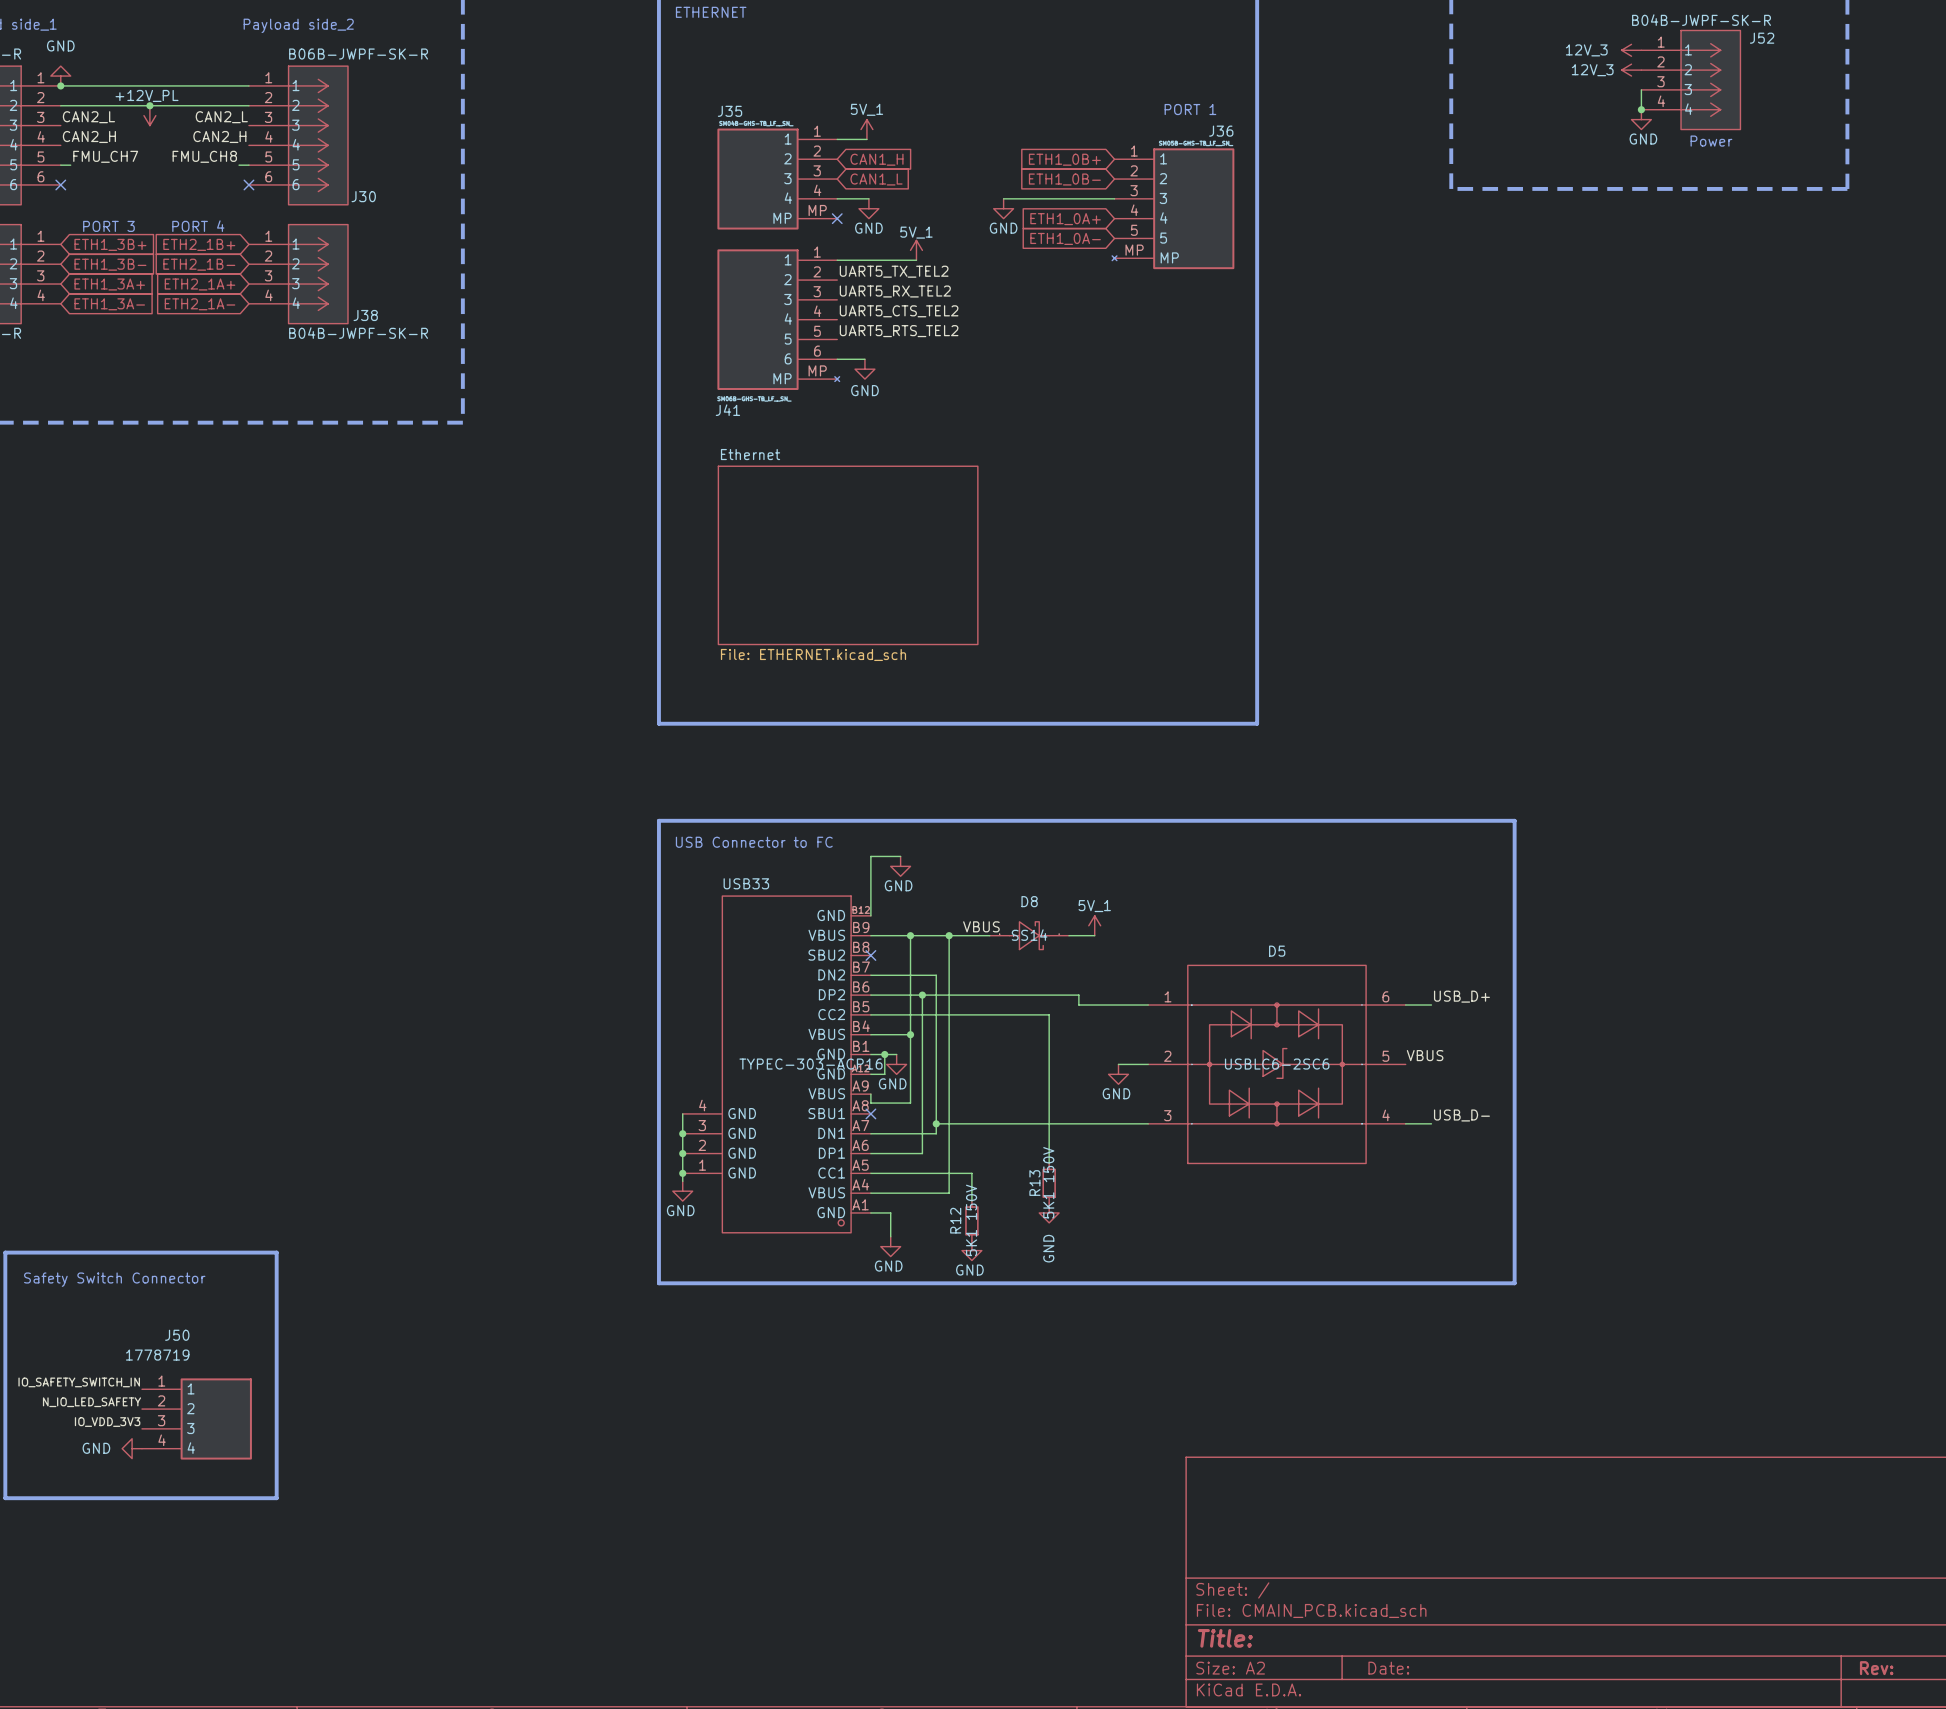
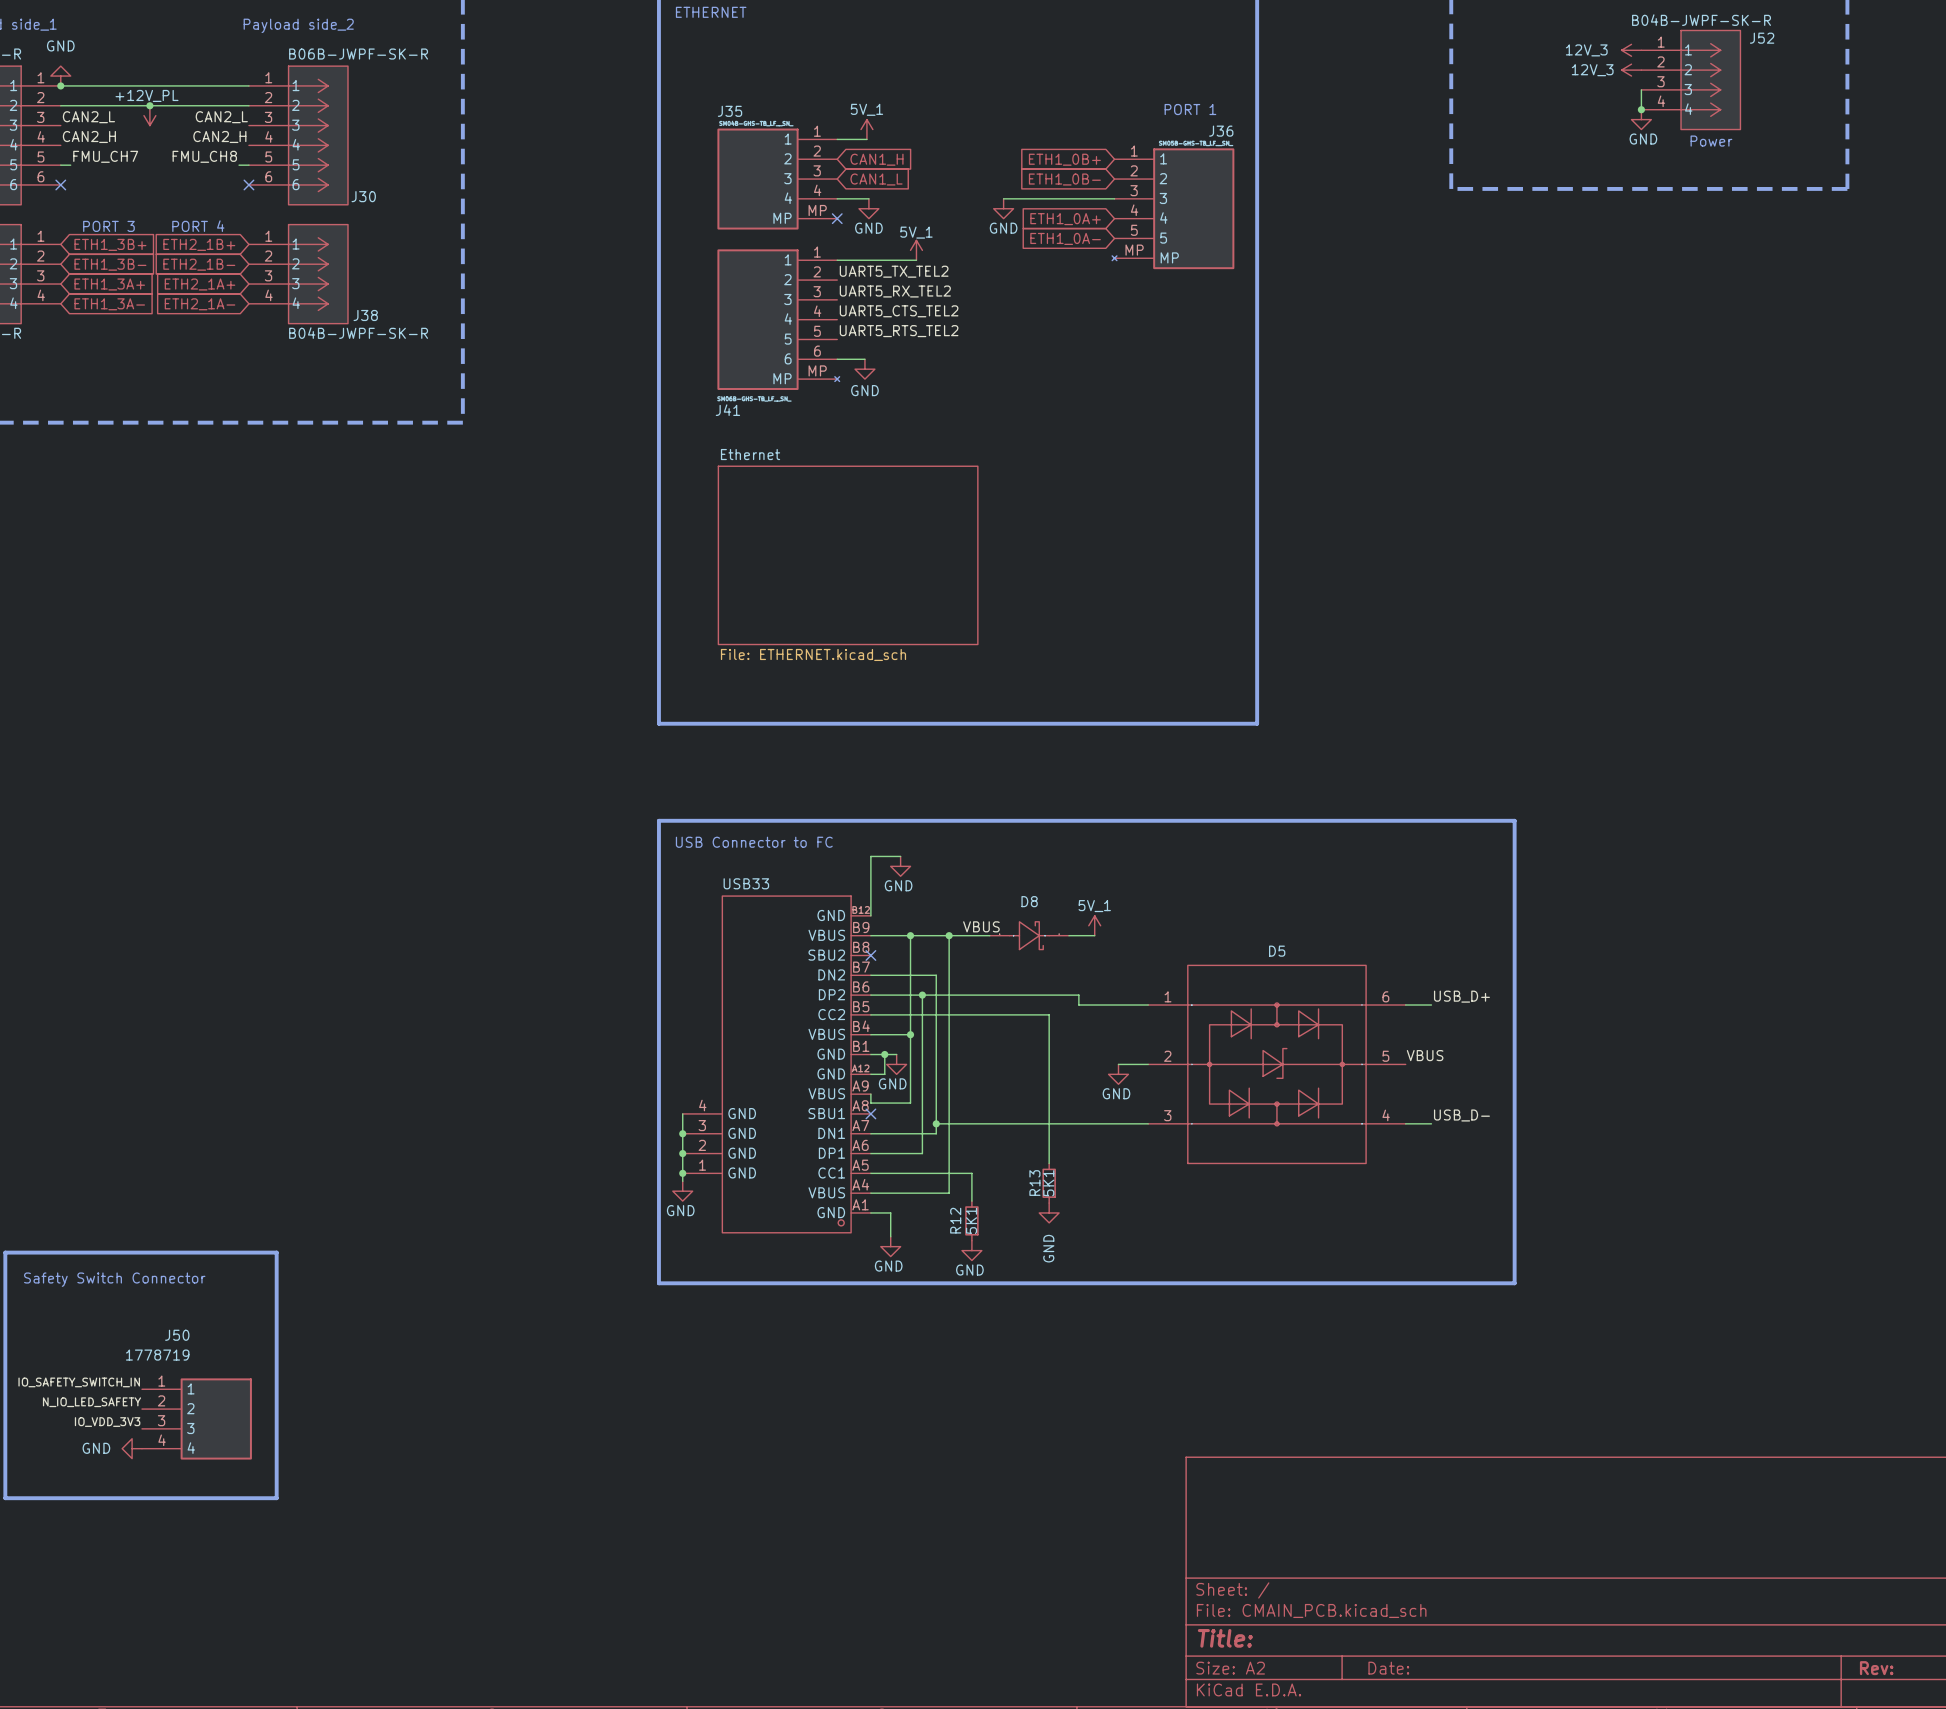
D8 value: SS14 (1029, 935) -> none
USB33 value: TYPEC-303-ACP16 (811, 1064) -> none
D5 value: USBLC6-2SC6 (1277, 1064) -> none
R13 value: 5K1 150V (1048, 1182) -> 5K1 (1048, 1183)
R12 value: 5K1 150V (971, 1220) -> 5K1 (971, 1220)

